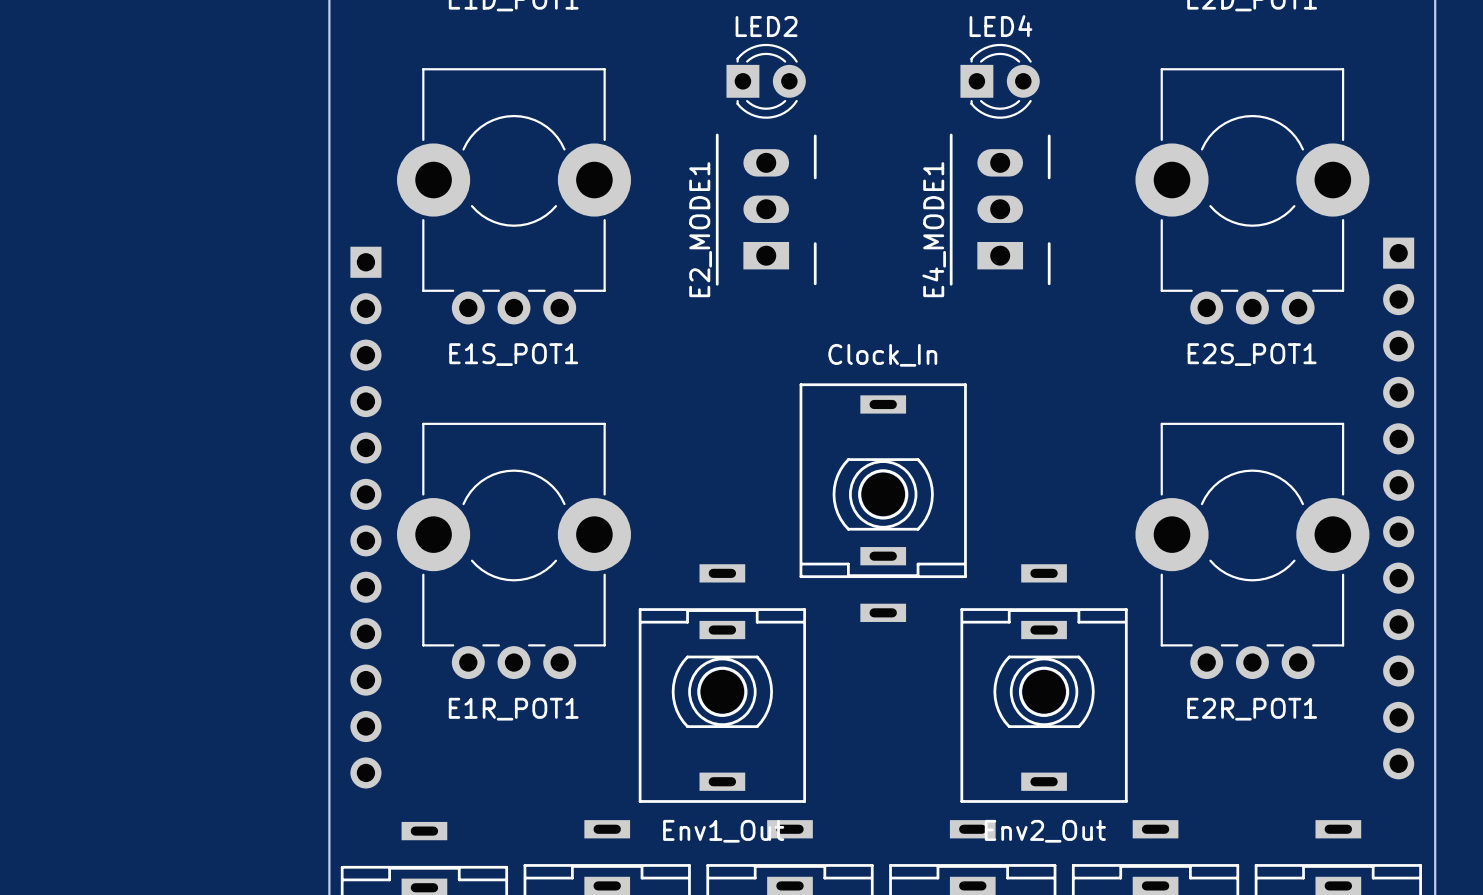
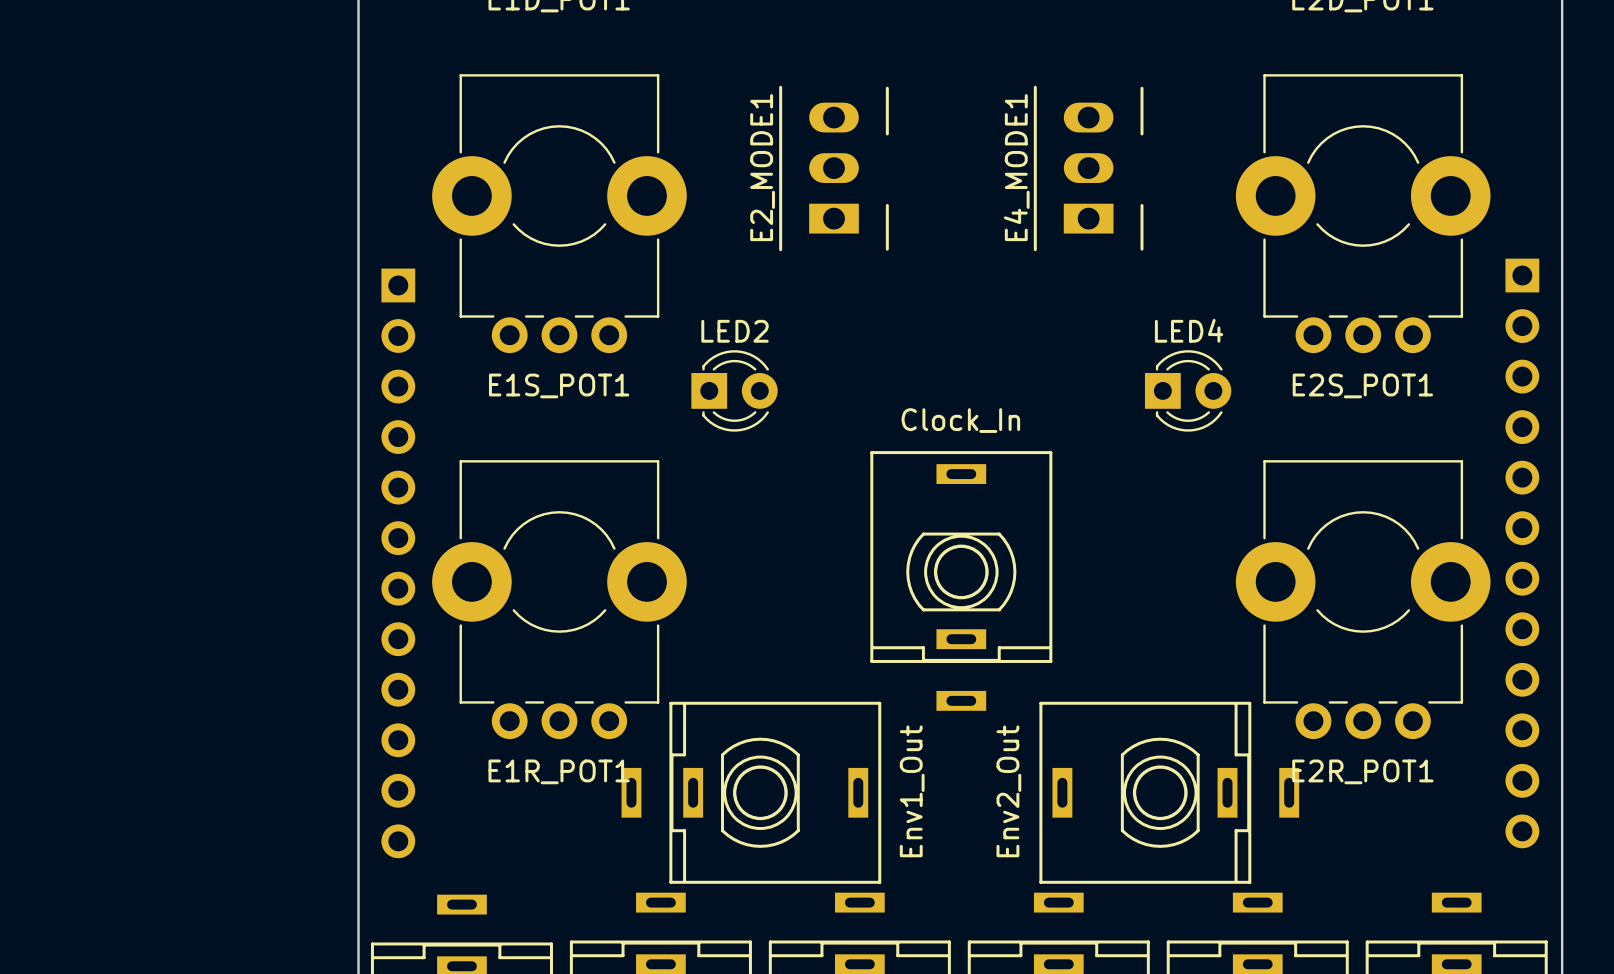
LED2 position: (766, 81) -> (734, 390)
LED4 position: (1000, 81) -> (1188, 390)
E2_MODE1 position: (766, 209) -> (834, 168)
E4_MODE1 position: (1000, 209) -> (1088, 168)
E2_MODE1 name position: E2_MODE1 (700, 229) -> E2_MODE1 (762, 167)
E4_MODE1 name position: E4_MODE1 (934, 229) -> E4_MODE1 (1016, 167)
part position: (883, 502) -> (961, 580)
part rotation: 0° (722, 683) -> 90° counterclockwise (751, 792)
part rotation: 0° (1044, 683) -> 90° clockwise (1169, 792)

